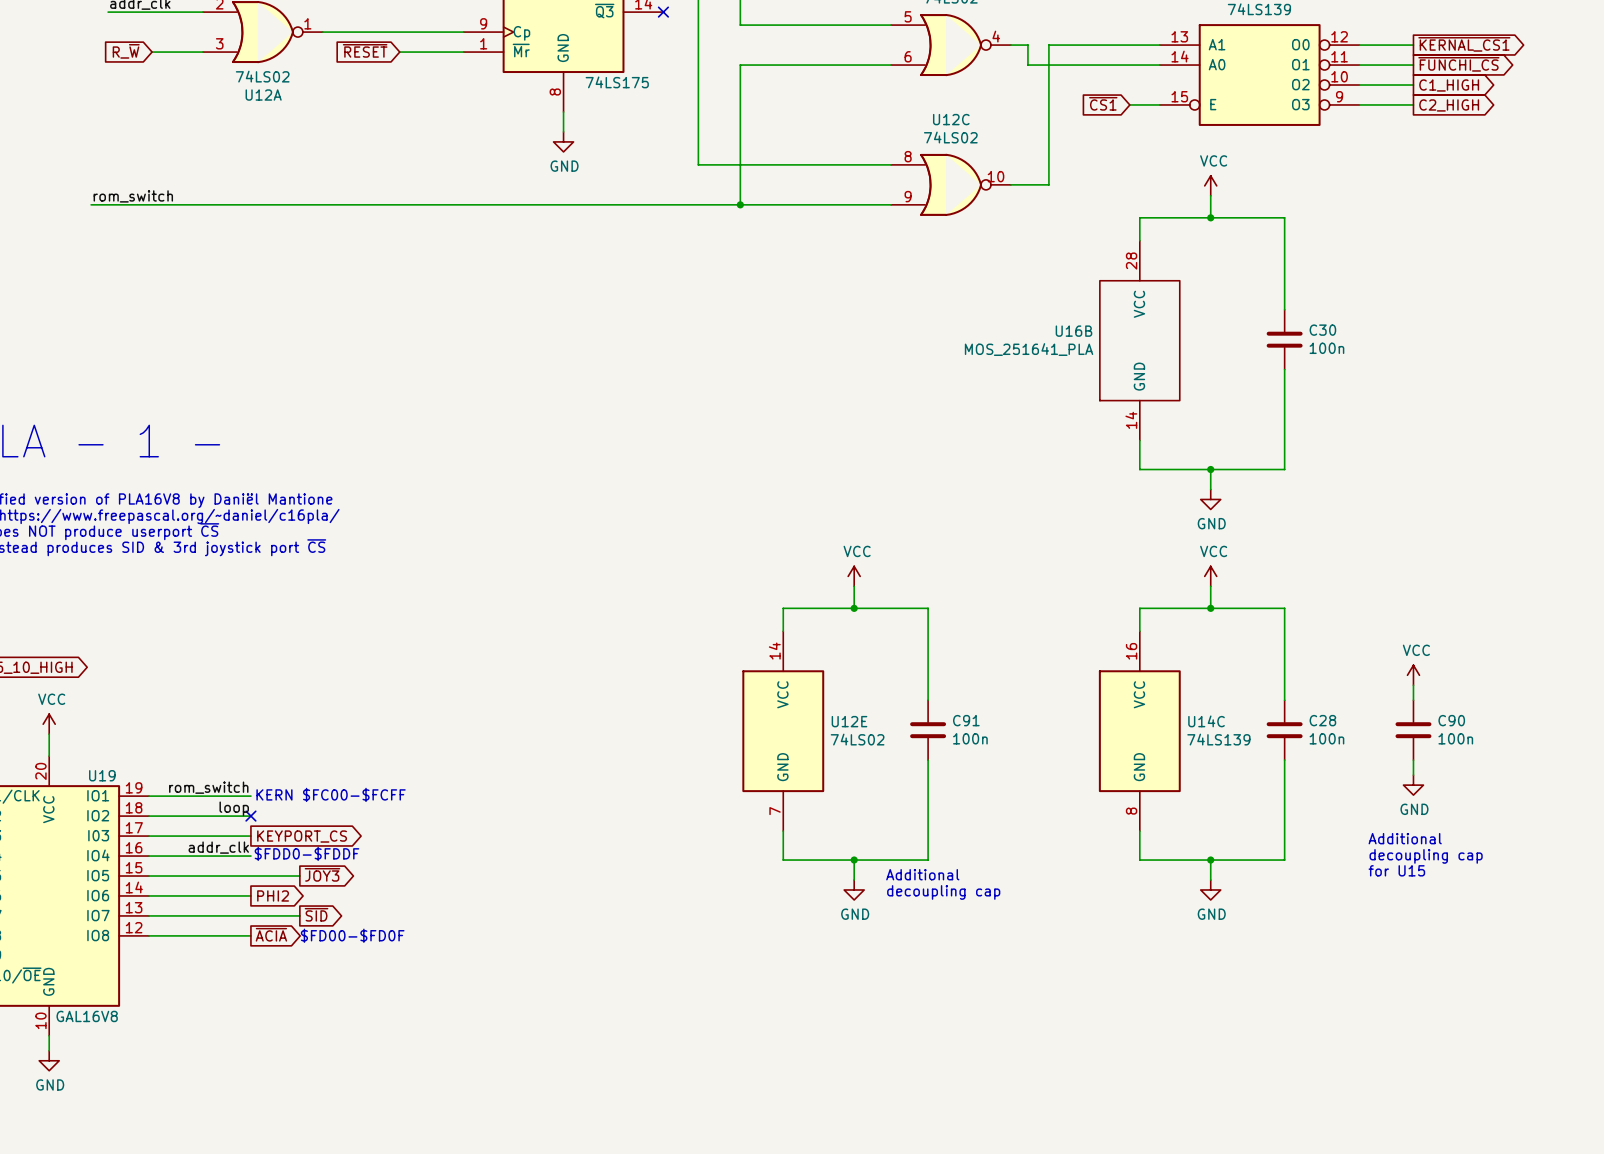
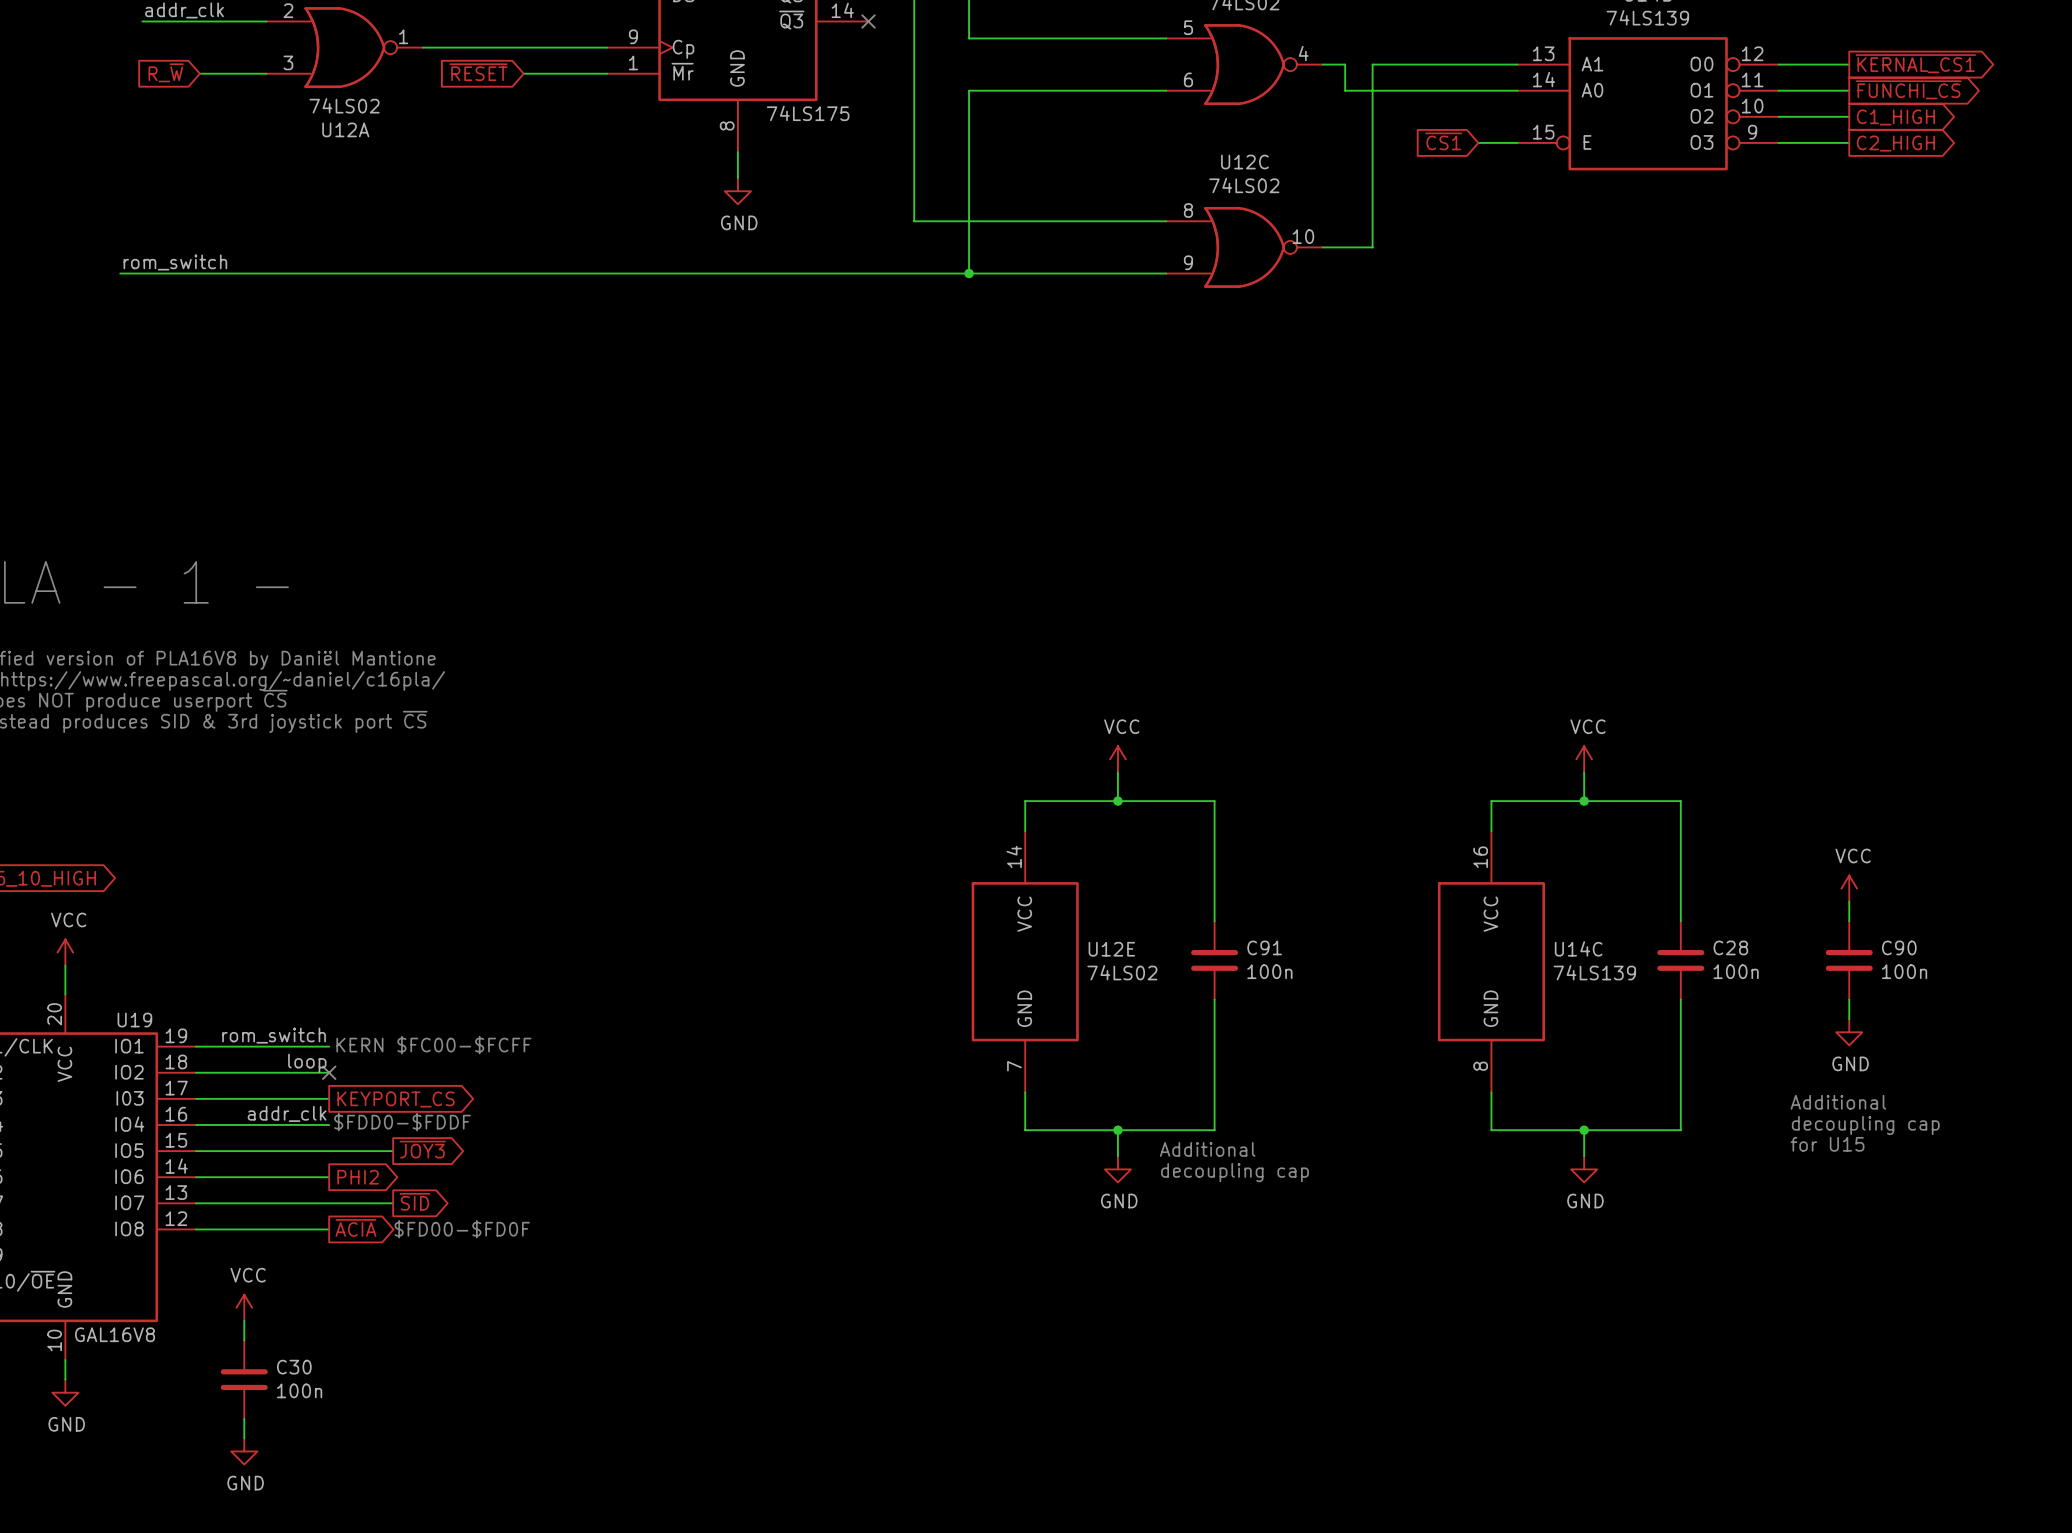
power symbol: VCC (1210, 185) -> none
wire: (1210, 195) (1210, 217) -> none
junction: (1210, 217) -> none
wire: (1139, 240) (1139, 217) (1284, 217) (1284, 309) -> none
C30 position: (1284, 339) -> (244, 1379)
U16B: MOS_251641_PLA (1139, 340) -> none
wire: (1284, 369) (1284, 469) (1139, 469) (1139, 440) -> none
wire: (1210, 469) (1210, 489) -> none
junction: (1210, 469) -> none
power symbol: GND (1210, 499) -> none
power symbol: none -> VCC (244, 1307)
wire: none -> (244, 1320) (244, 1340)
wire: none -> (244, 1418) (244, 1438)
power symbol: none -> GND (244, 1451)

